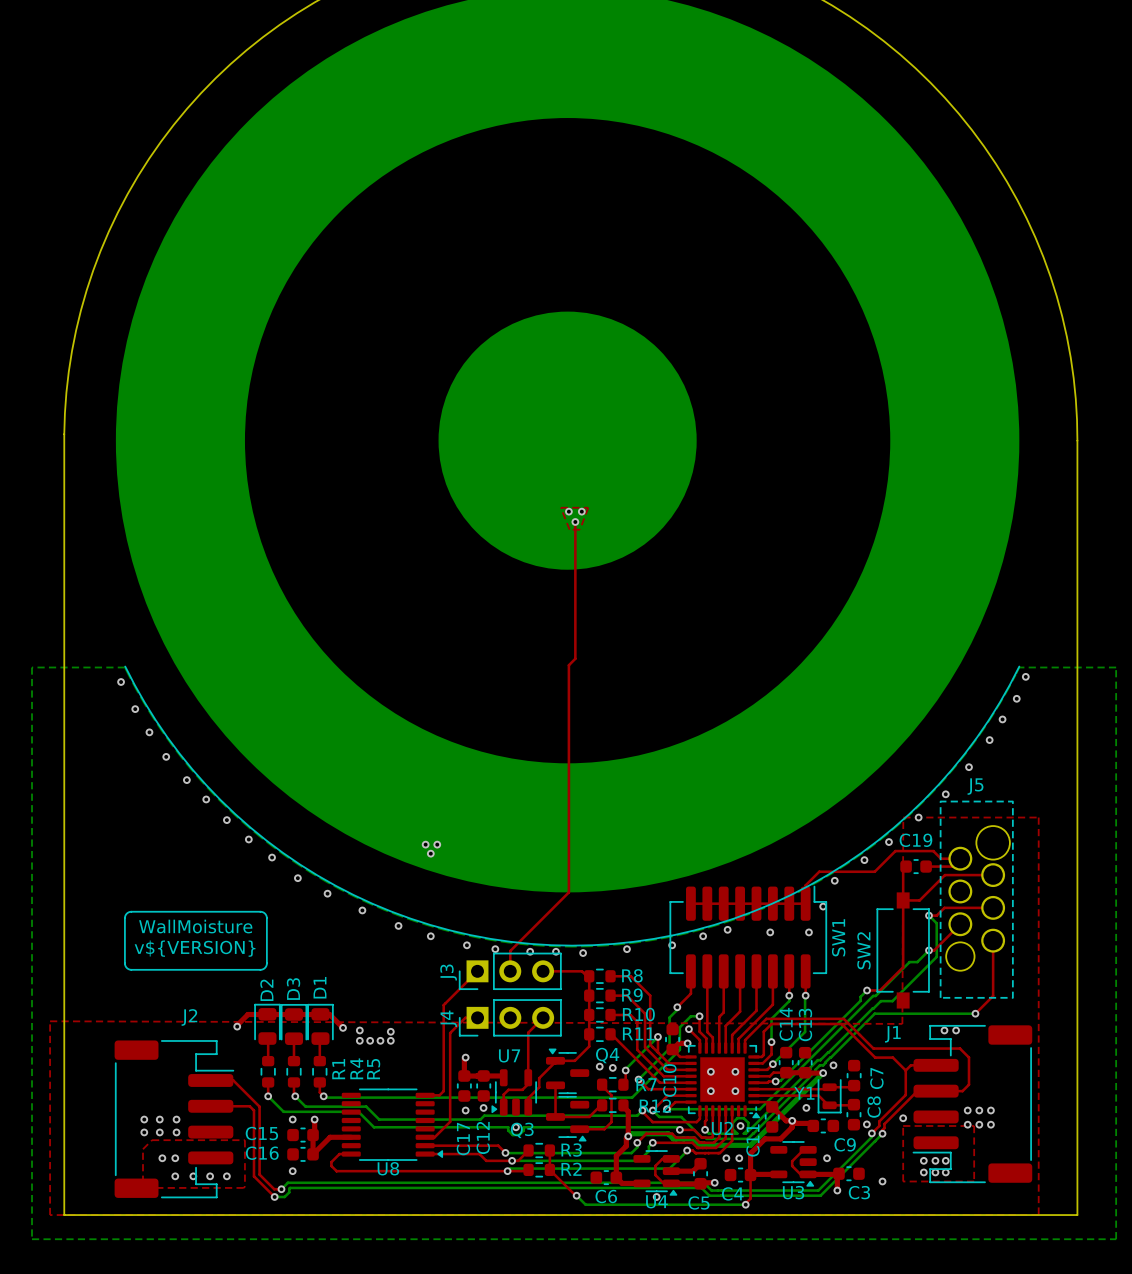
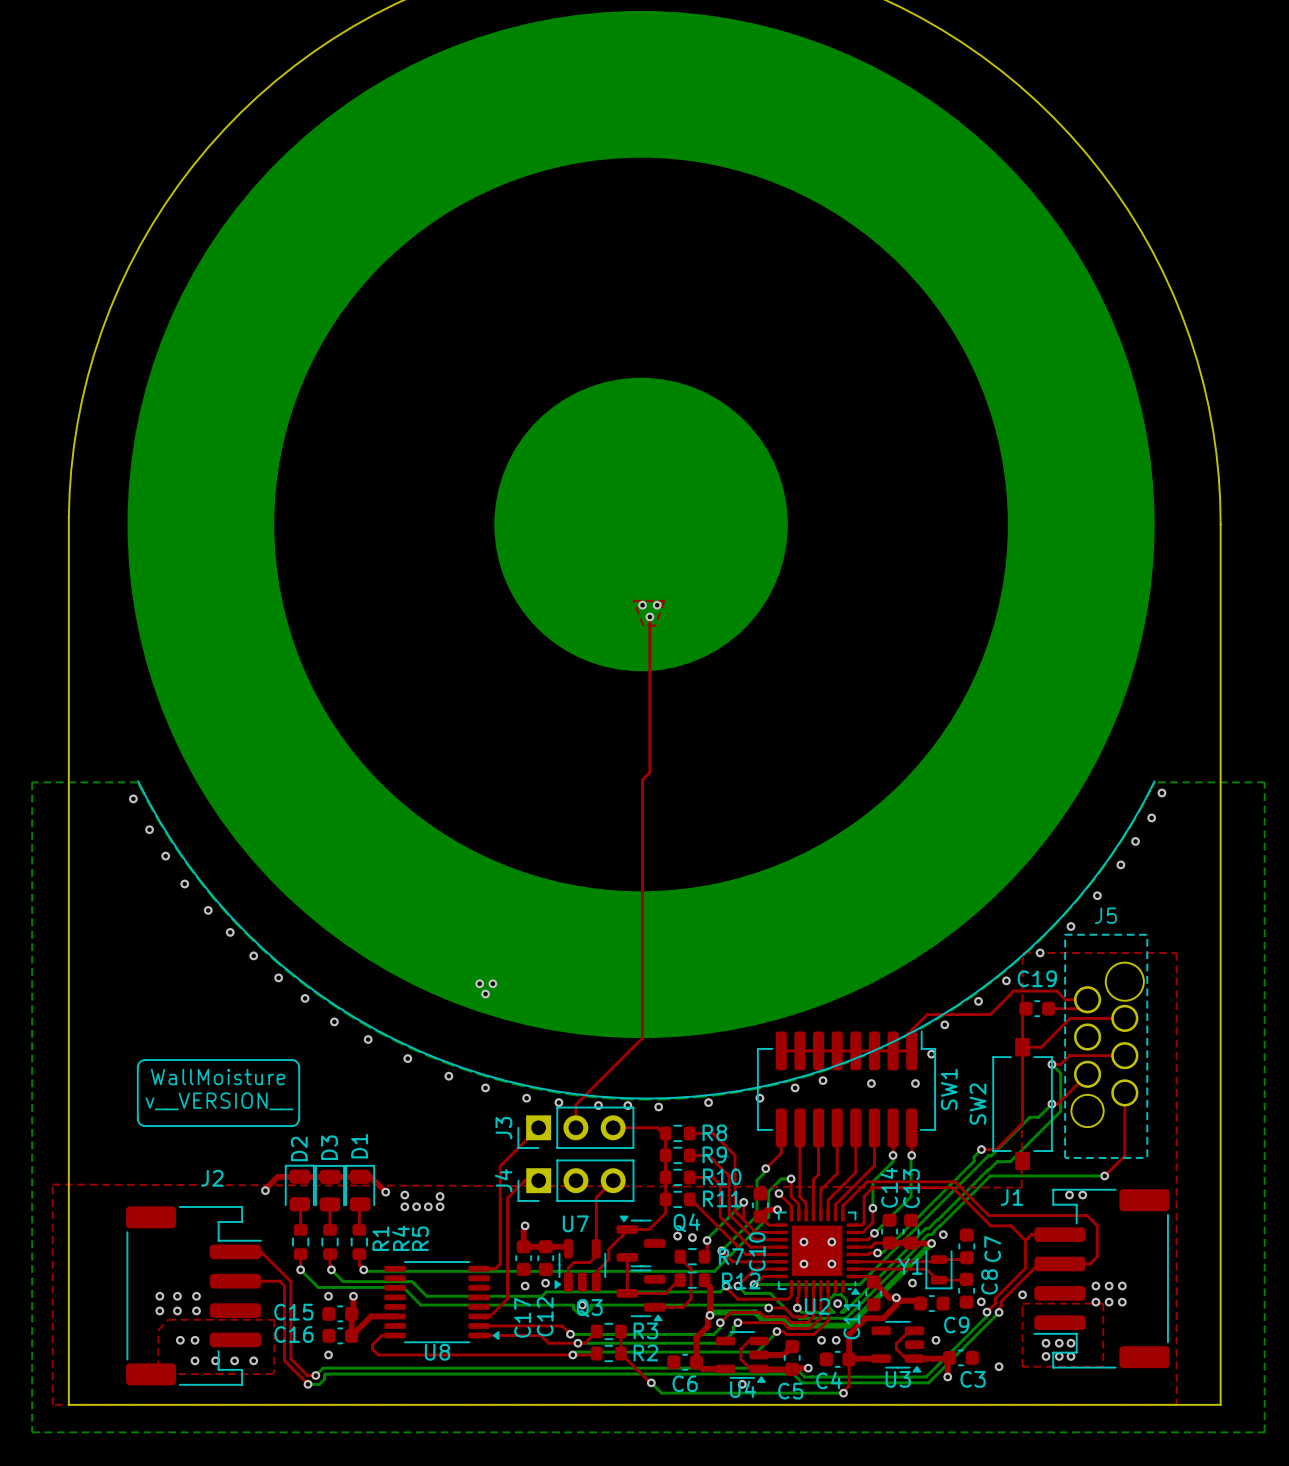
text: v${VERSION} (195, 948) -> v__VERSION__ (219, 1101)

